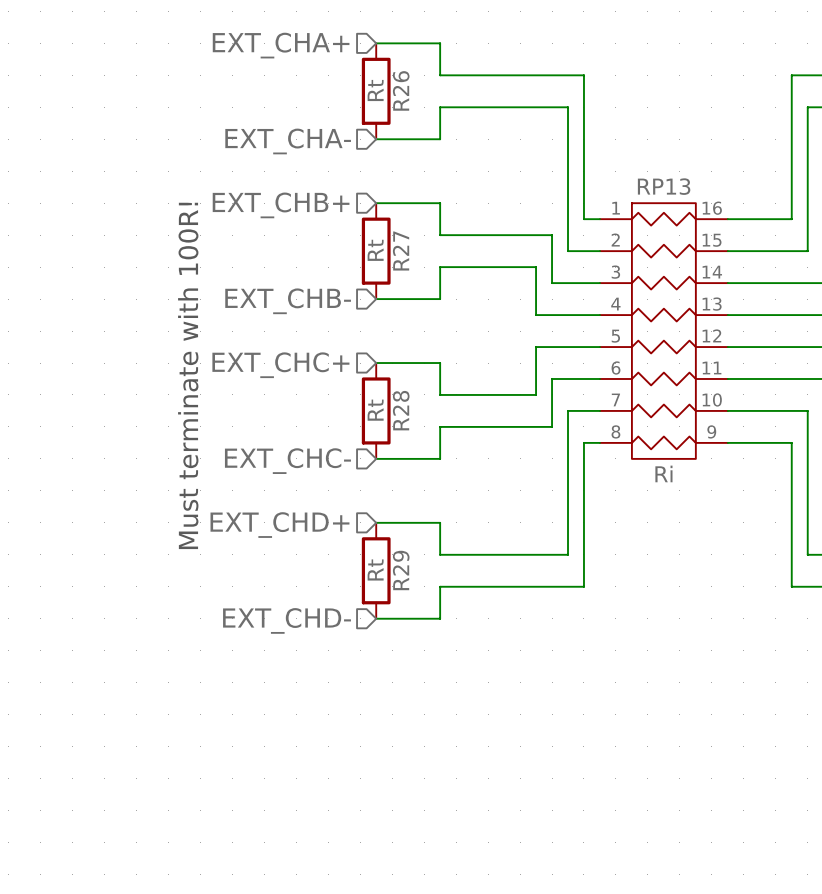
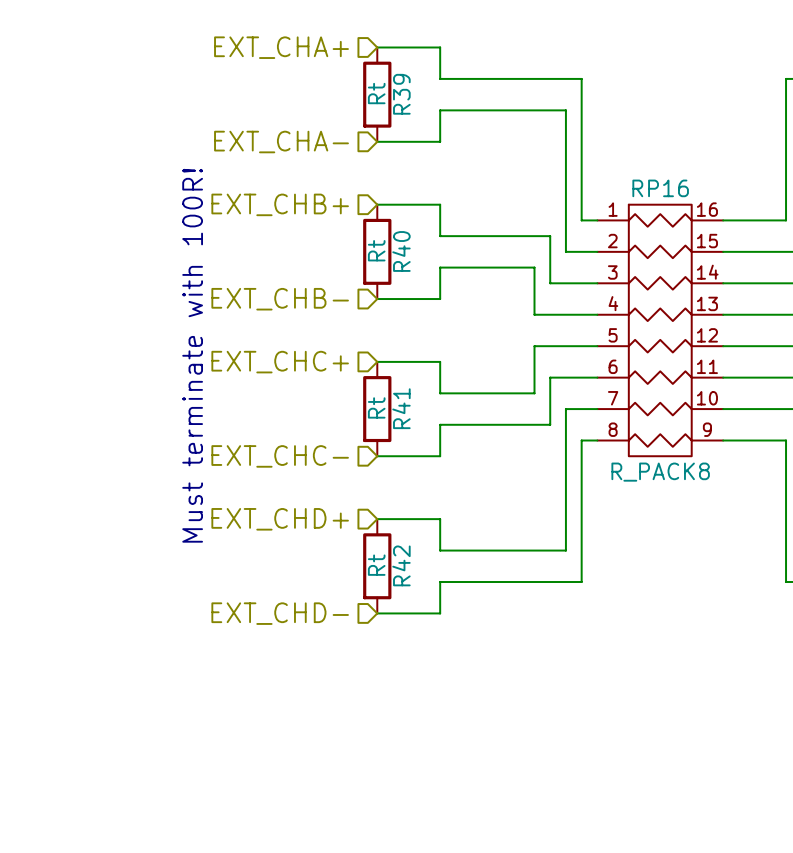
R26 name: R26 (401, 90) -> R39 (401, 94)
RP13 name: RP13 (664, 186) -> RP16 (660, 188)
R27 name: R27 (401, 250) -> R40 (401, 251)
R28 name: R28 (401, 410) -> R41 (401, 408)
RP13 value: Ri (663, 473) -> R_PACK8 (660, 472)
R29 name: R29 (401, 570) -> R42 (401, 565)

